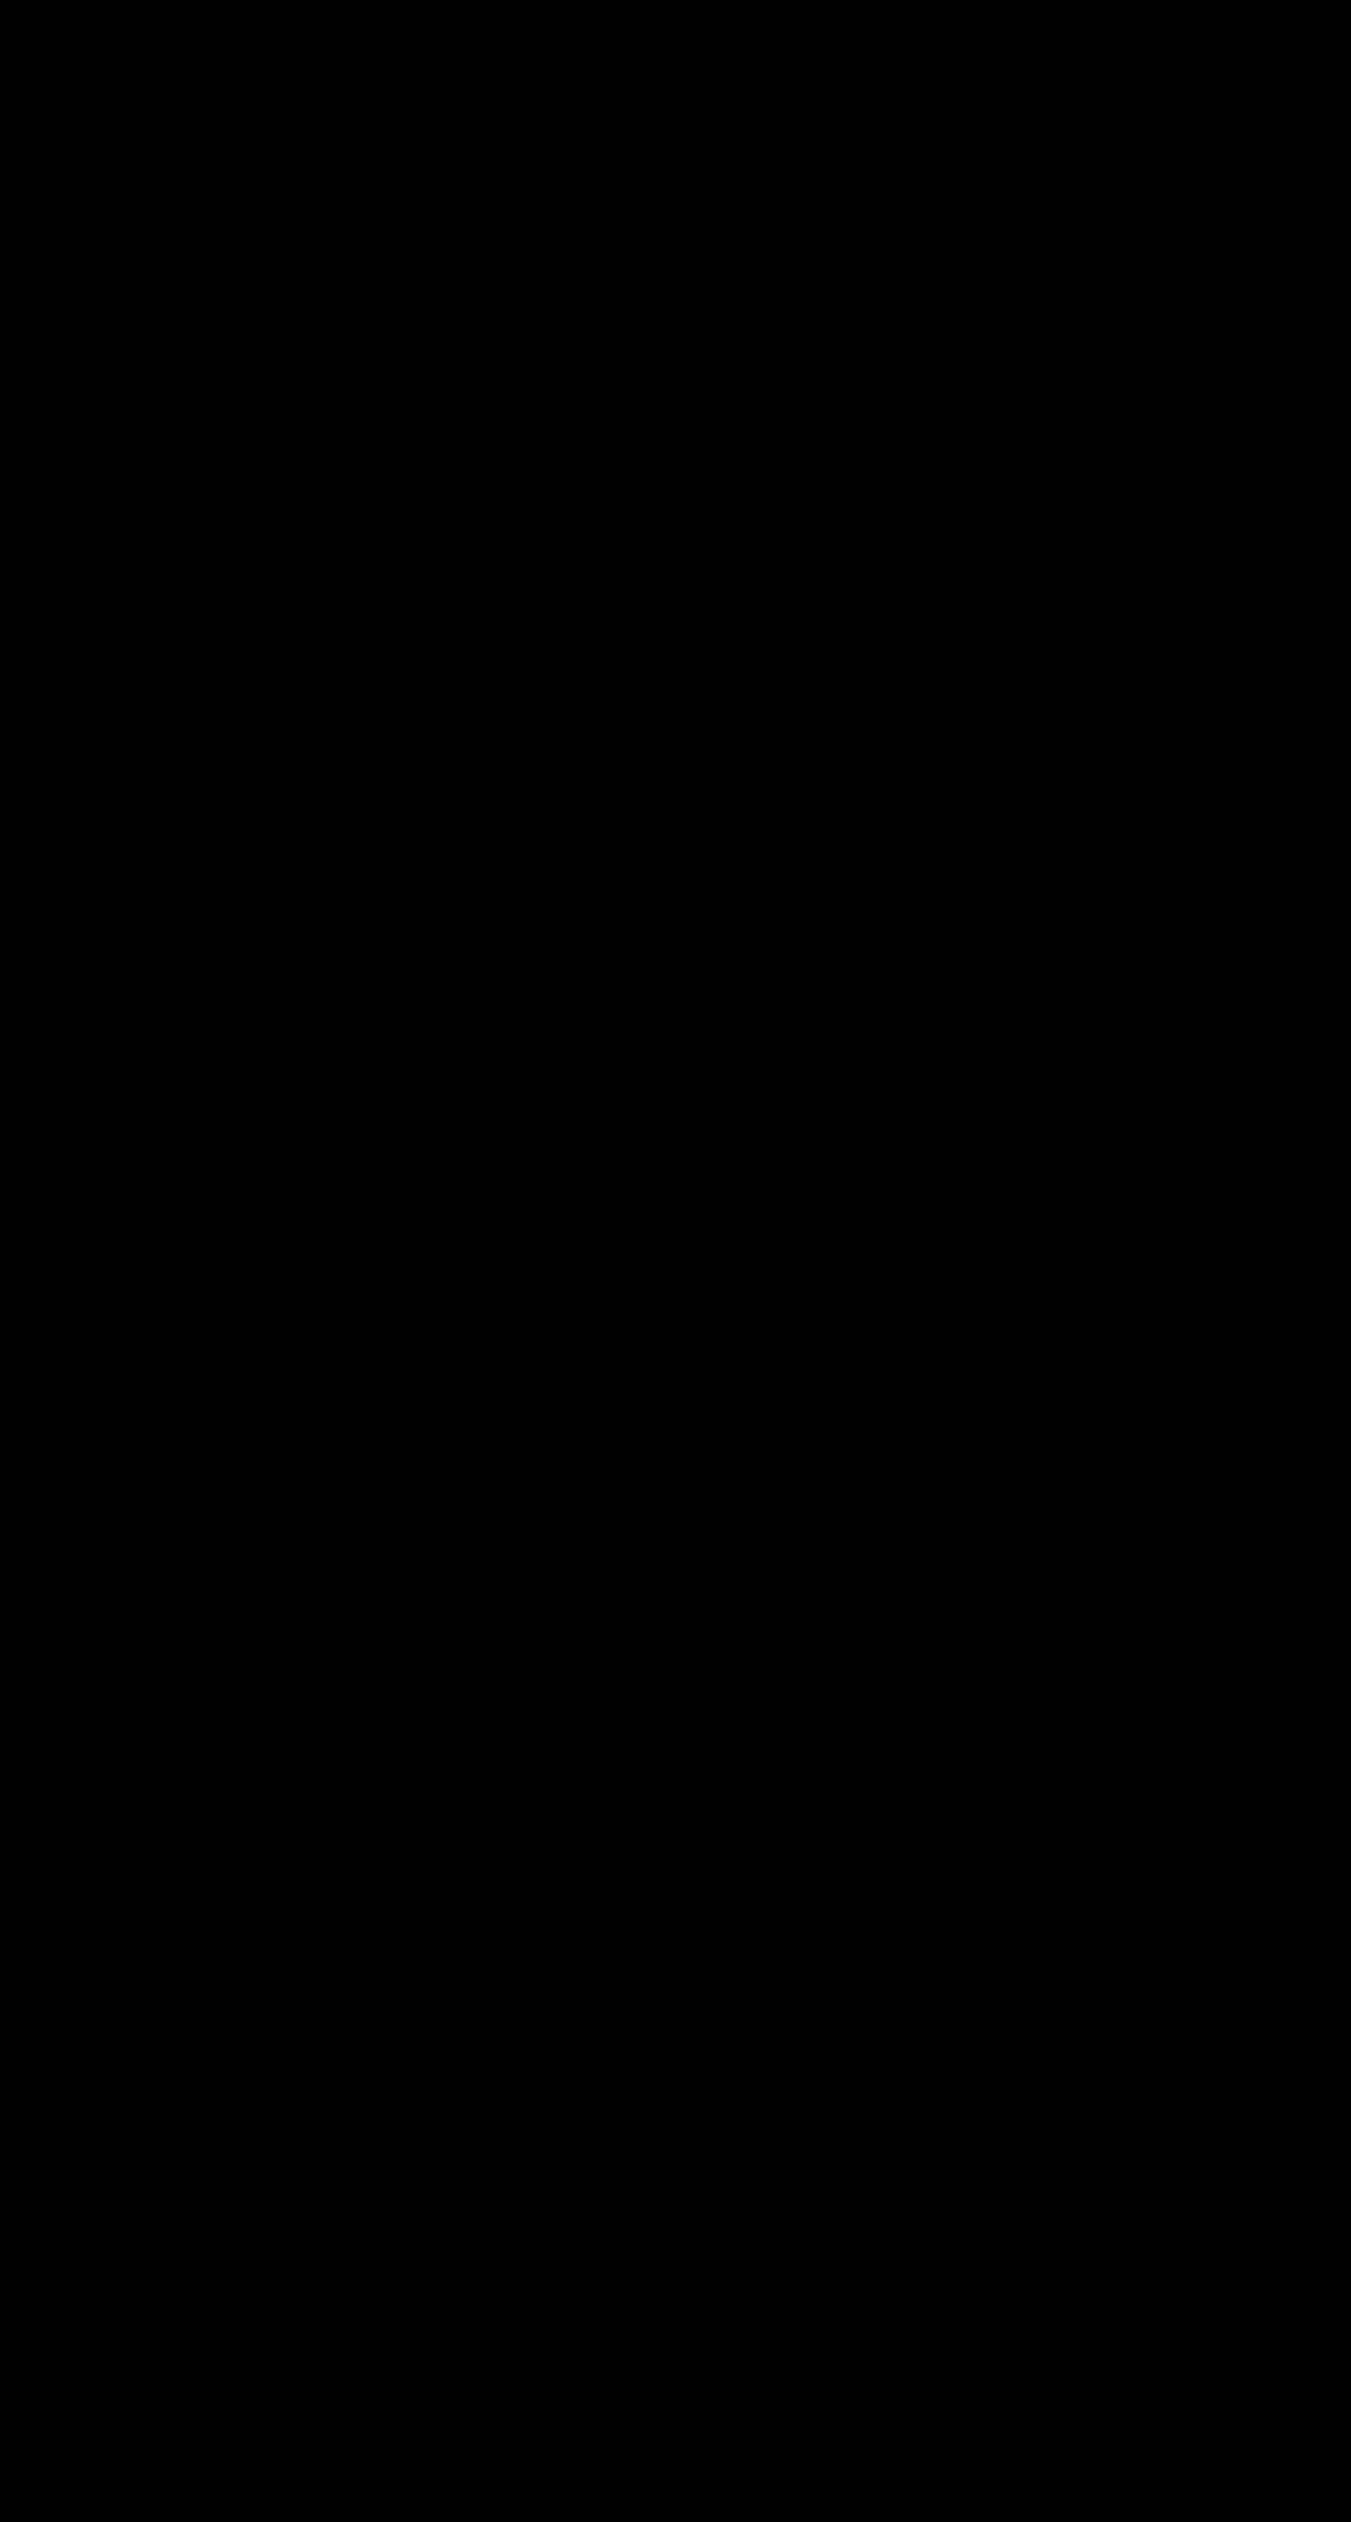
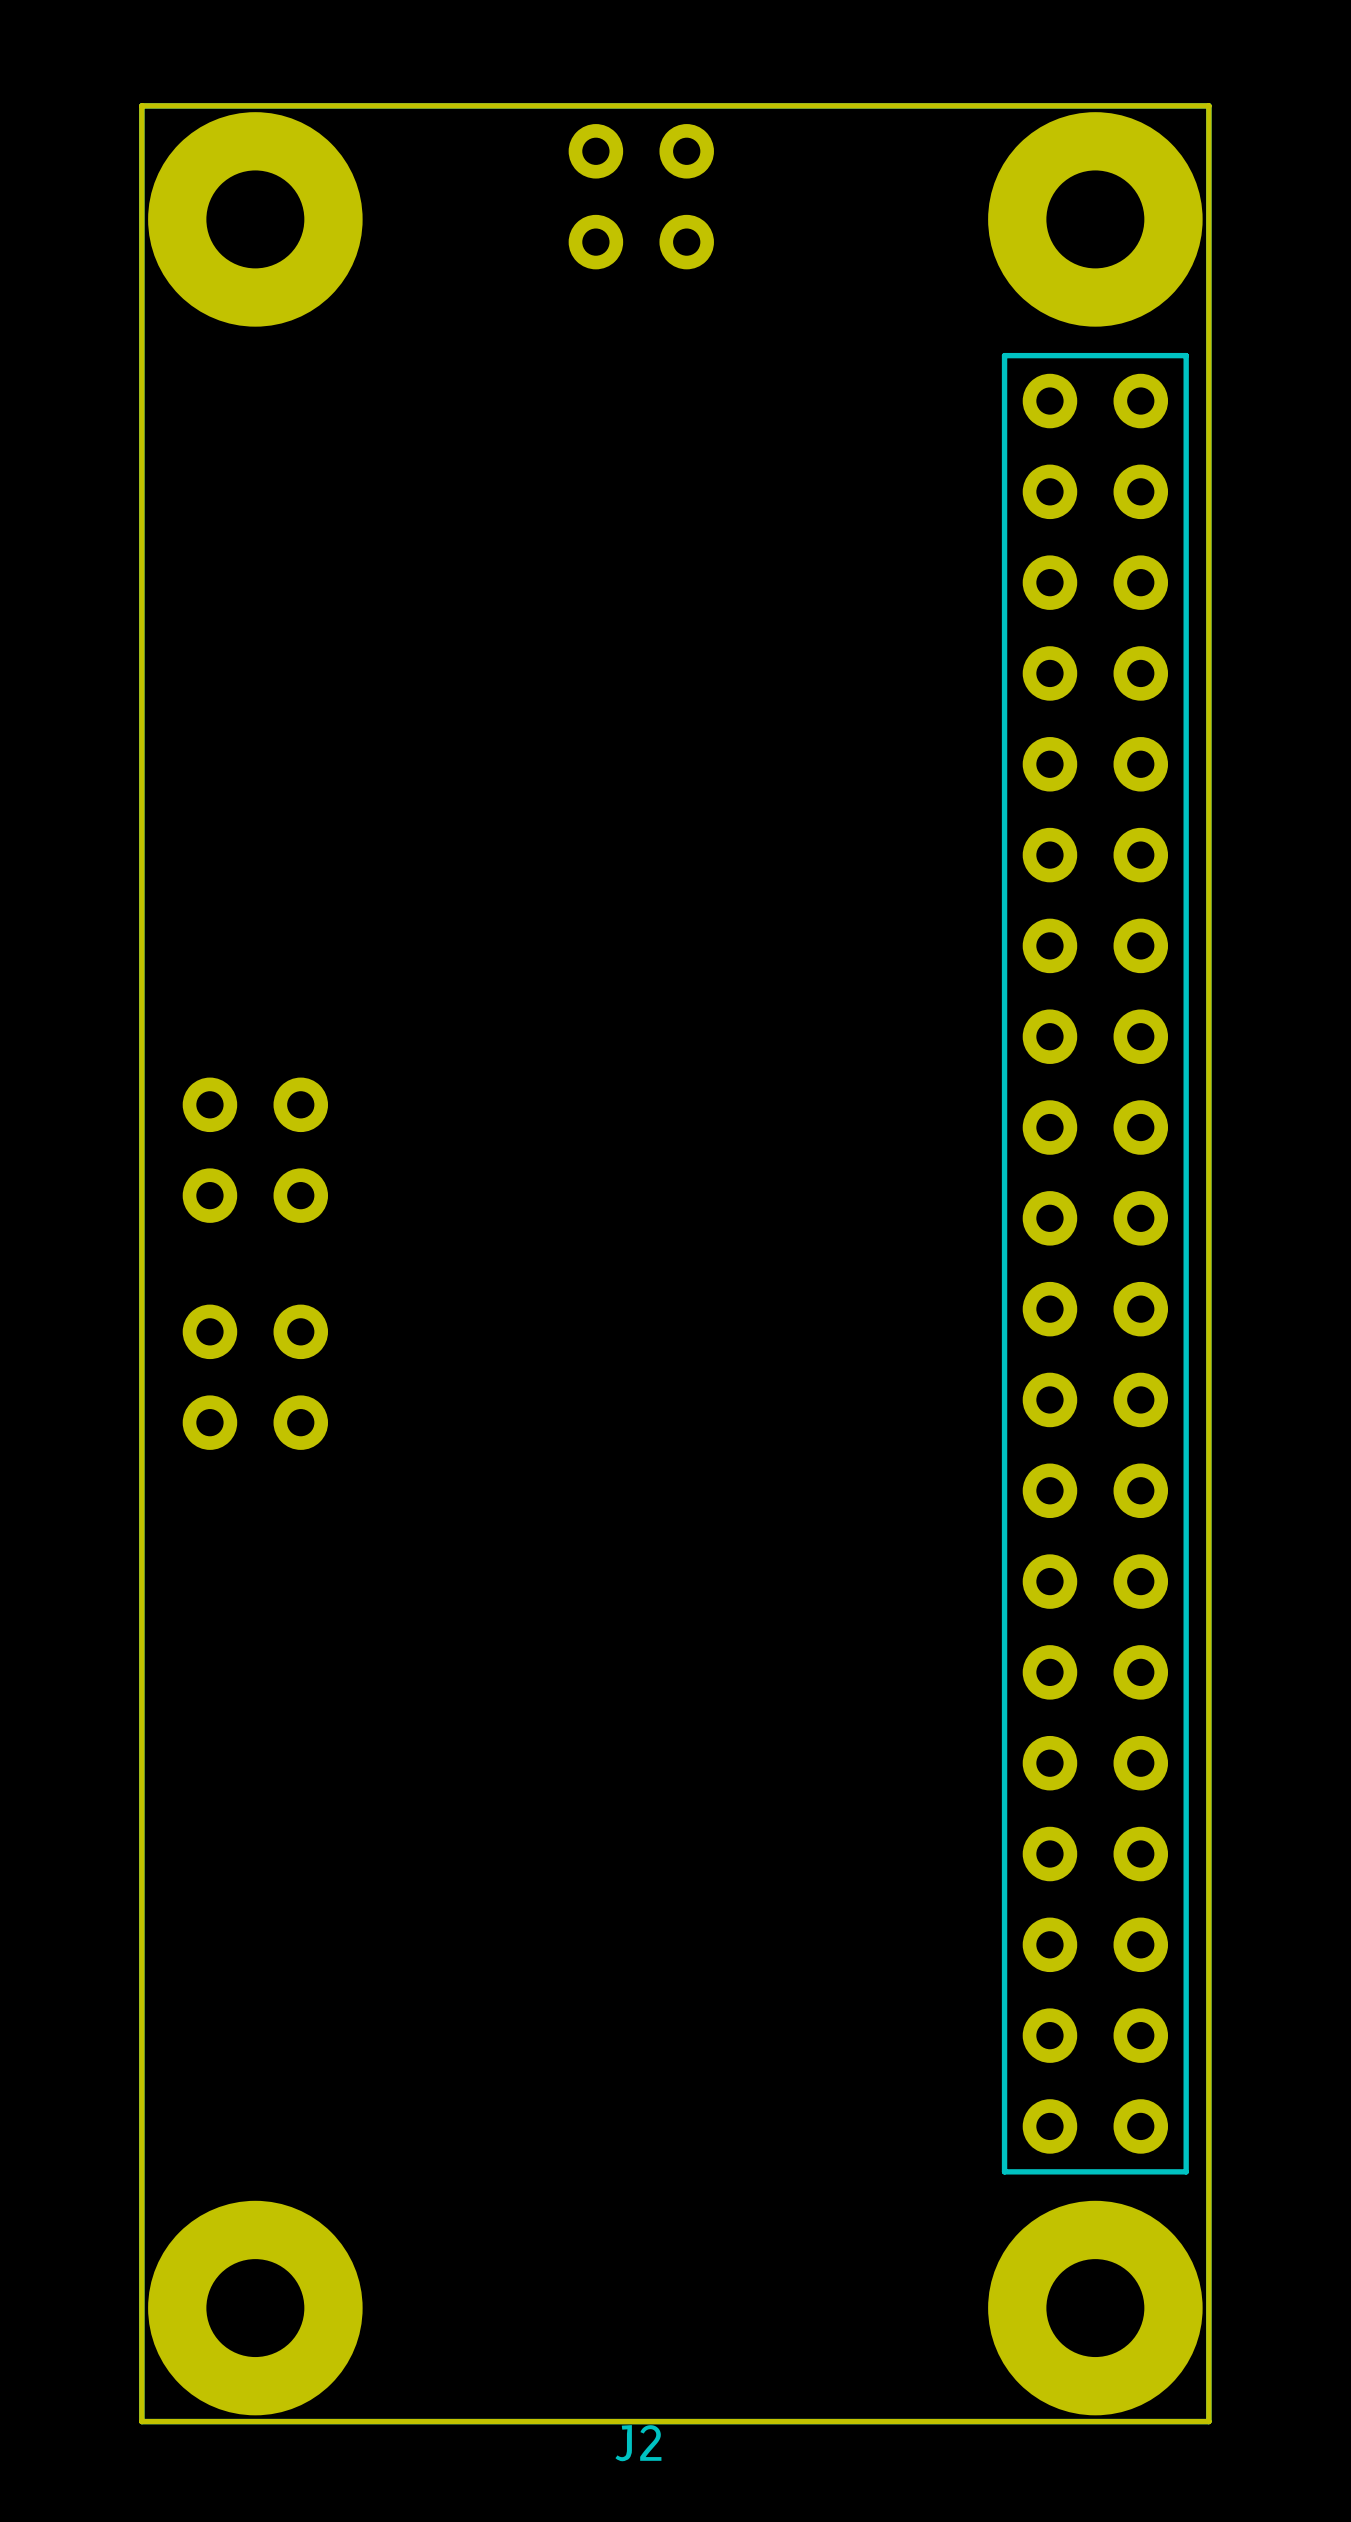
board edge: none -> (1208, 105) (1208, 2421) (141, 2421) (141, 105) (1208, 105)
part: none -> (641, 196)
part: none -> (255, 1150)
J2: none -> (675, 1263)
part: none -> (255, 1377)

